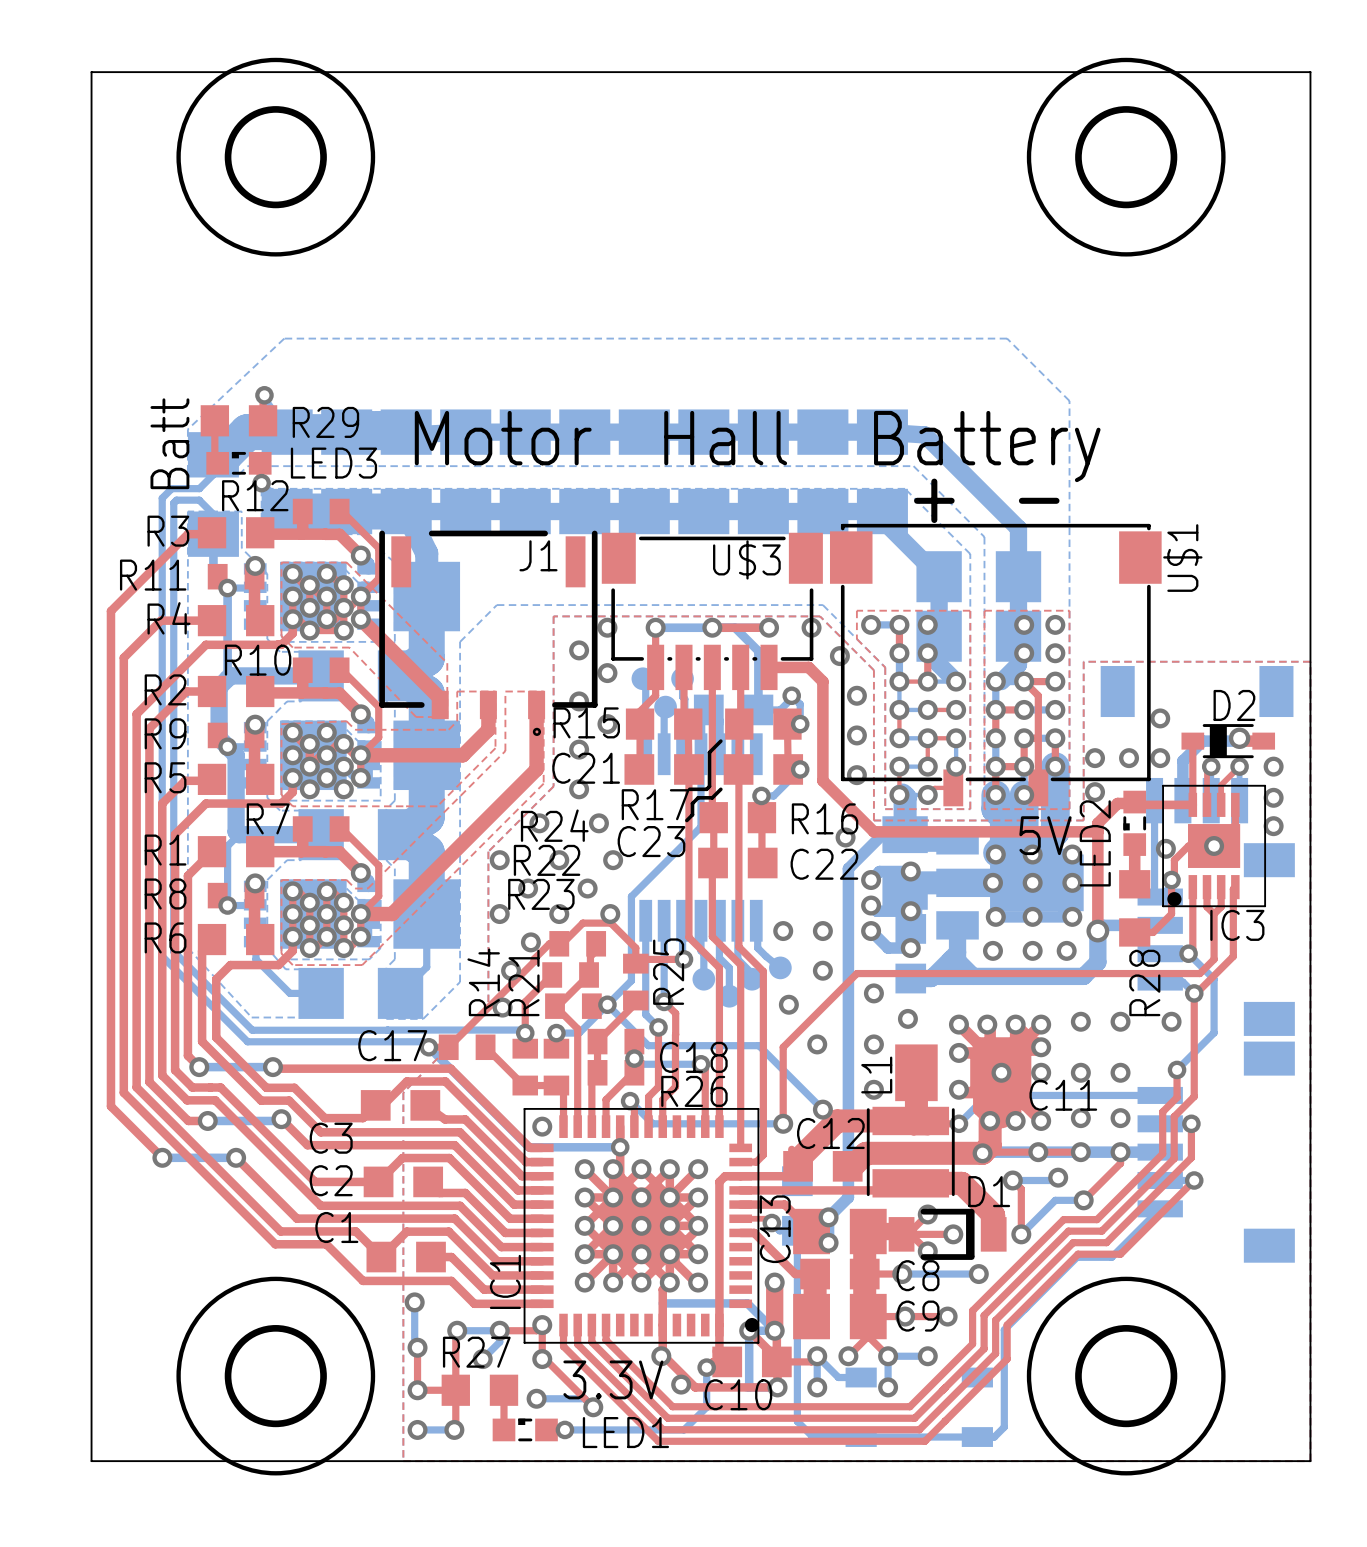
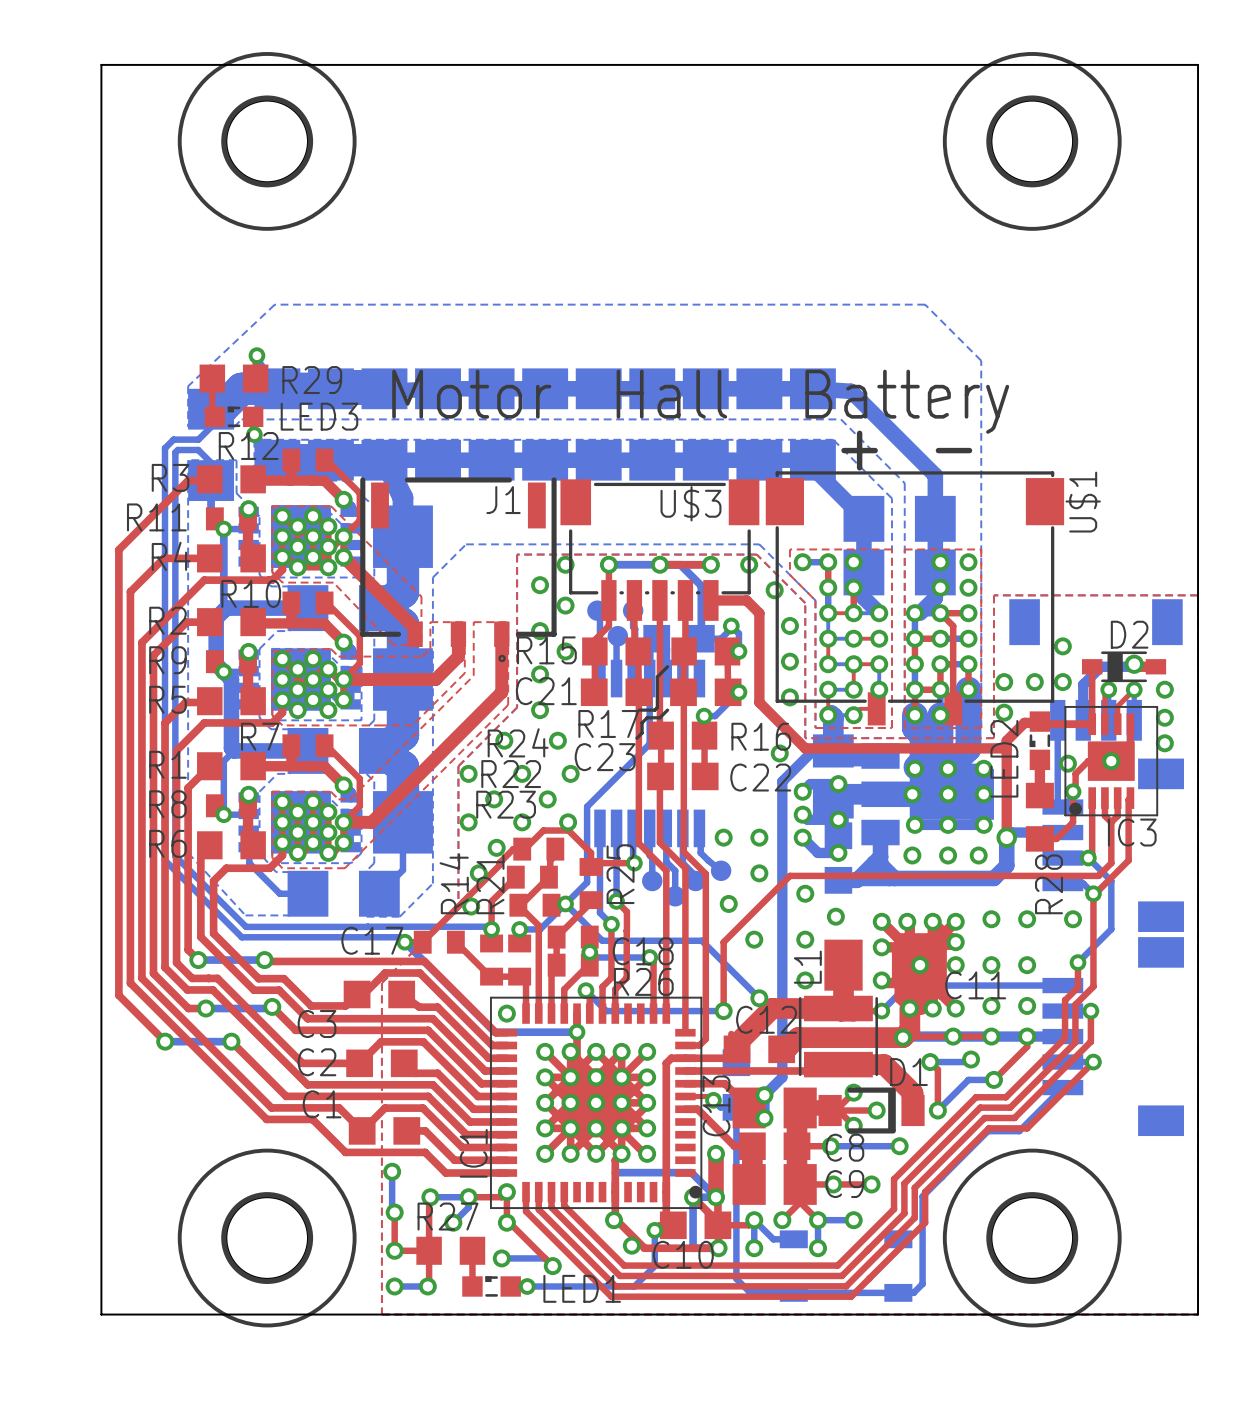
text: Batt (169, 443) -> none
text: 5V (1045, 835) -> none
text: 3.3V (613, 1379) -> none

